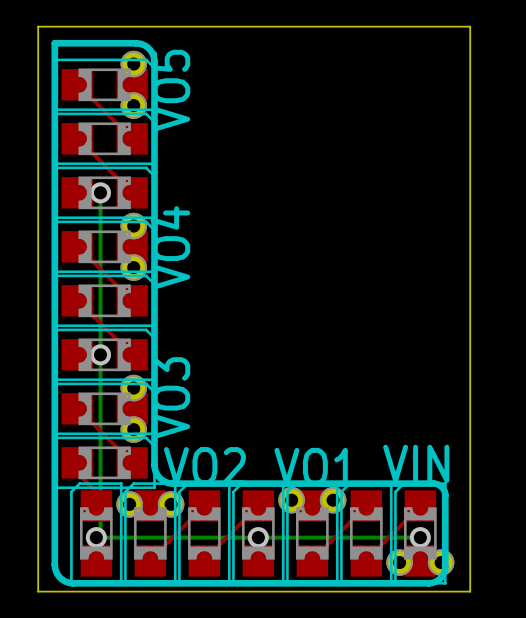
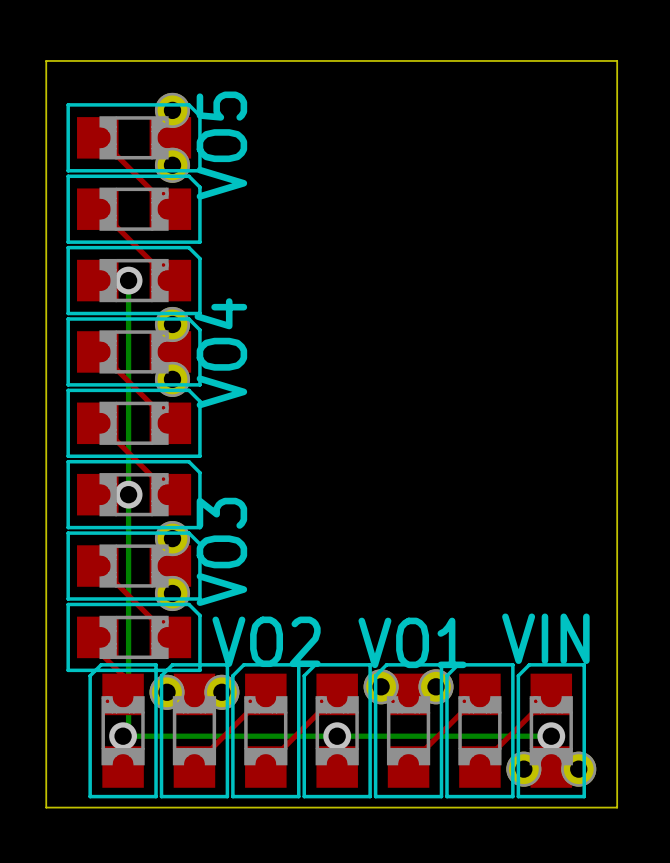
line: (54, 43) (54, 564) (58, 576) (66, 581) (73, 583) (428, 583) (438, 579) (445, 568) (445, 495) (442, 488) (438, 484) (173, 483) (165, 482) (158, 476) (154, 465) (153, 57) (149, 48) (138, 43) (54, 43) -> none

